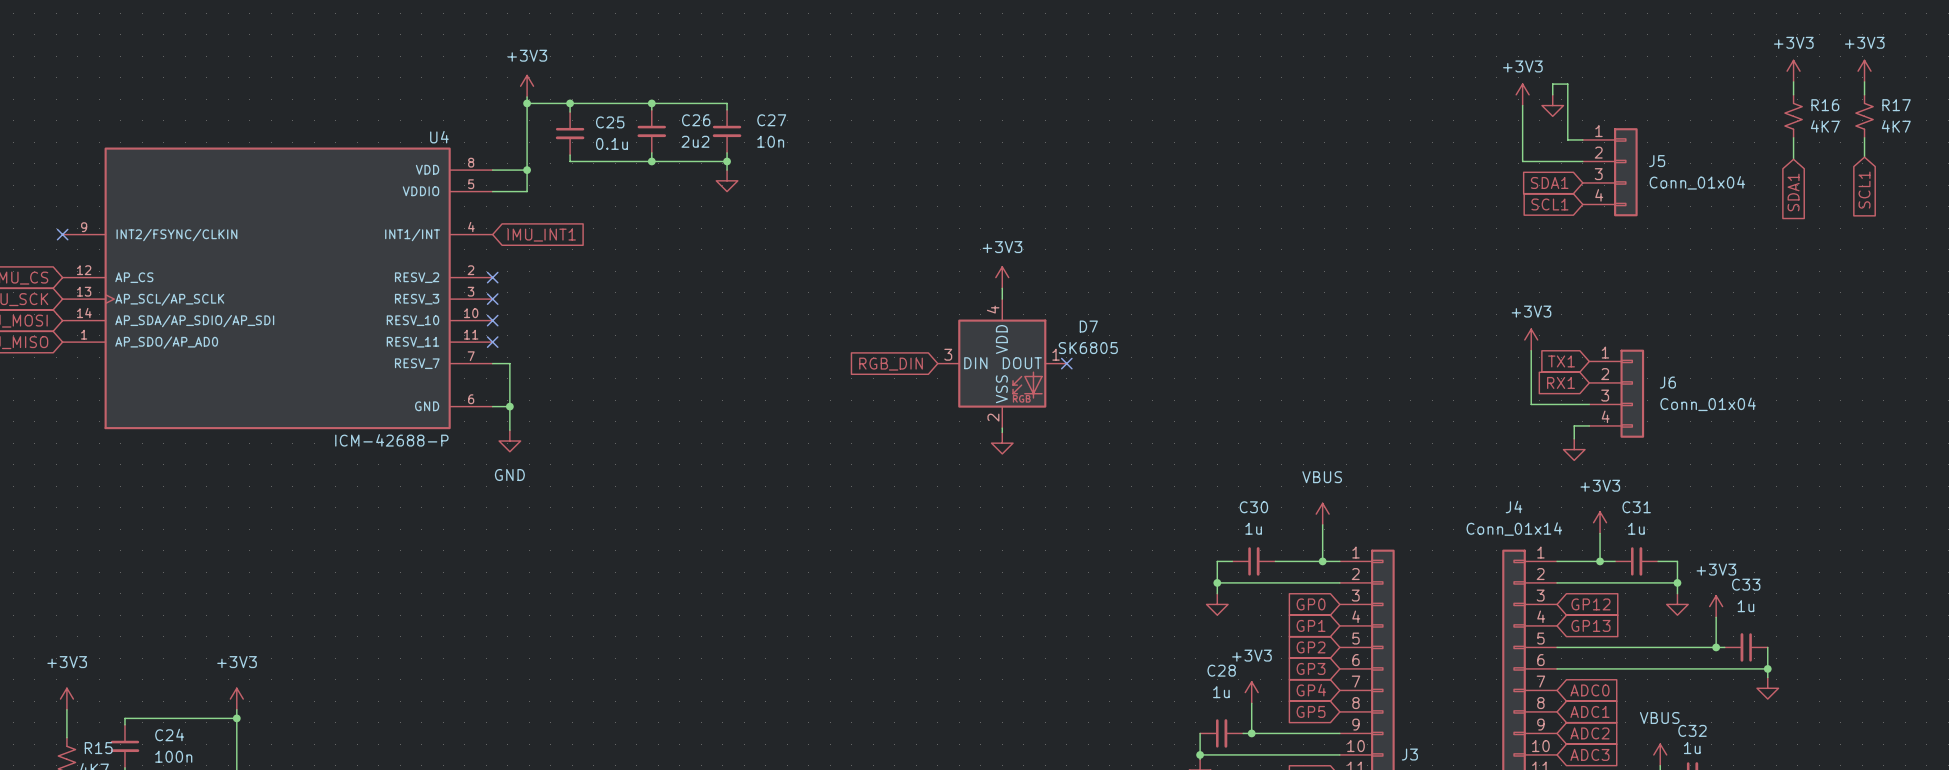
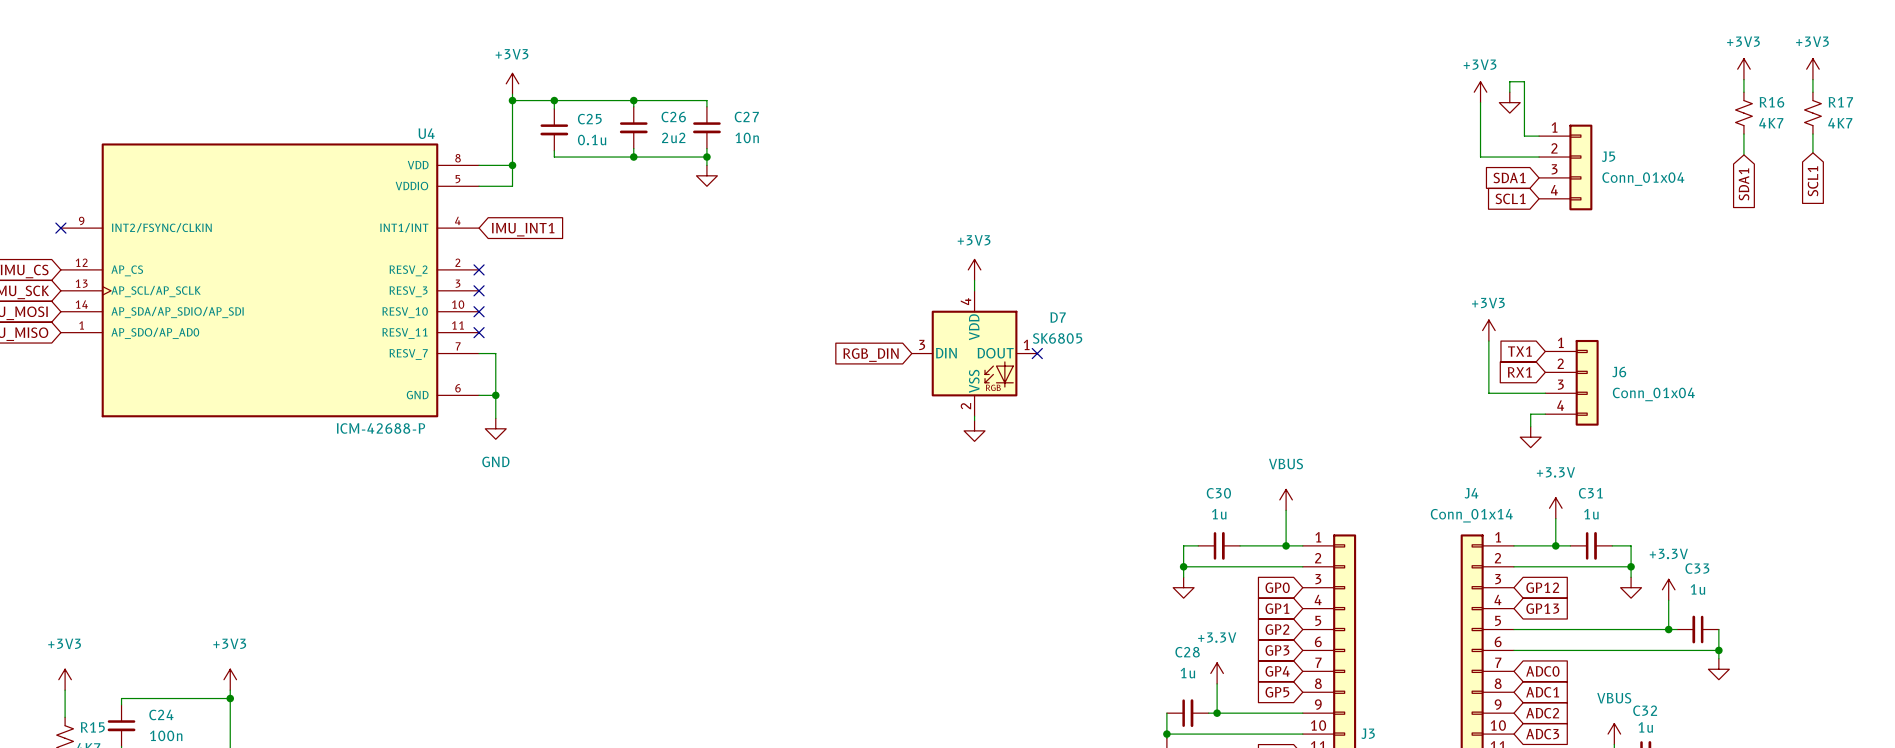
power symbol: +3V3 (1600, 522) -> +3.3V (1555, 508)
power symbol: +3V3 (1716, 606) -> +3.3V (1668, 589)
power symbol: +3V3 (1251, 692) -> +3.3V (1217, 673)

